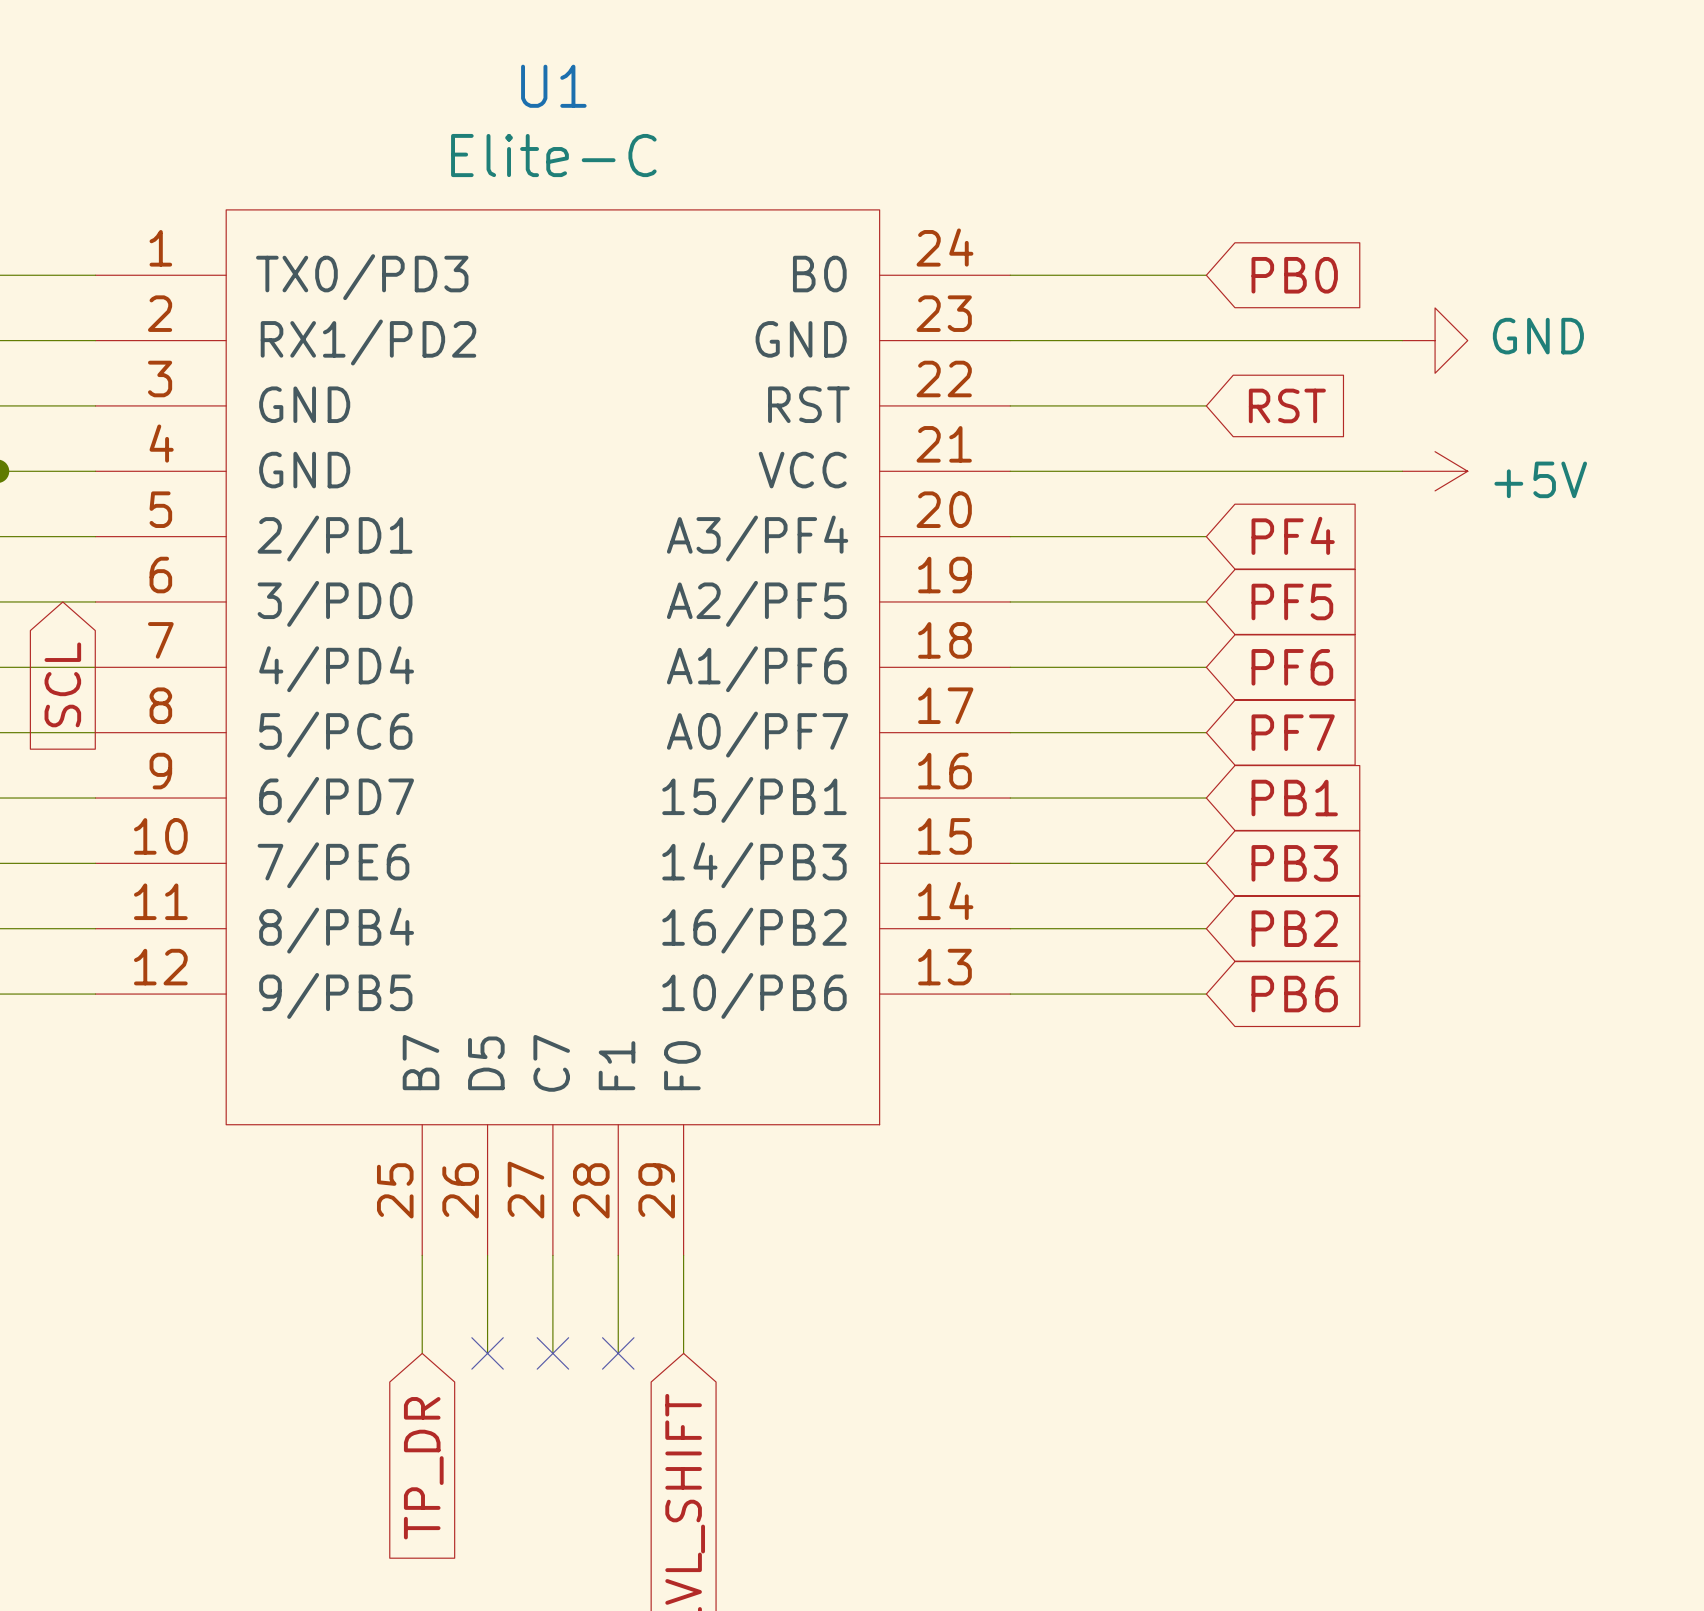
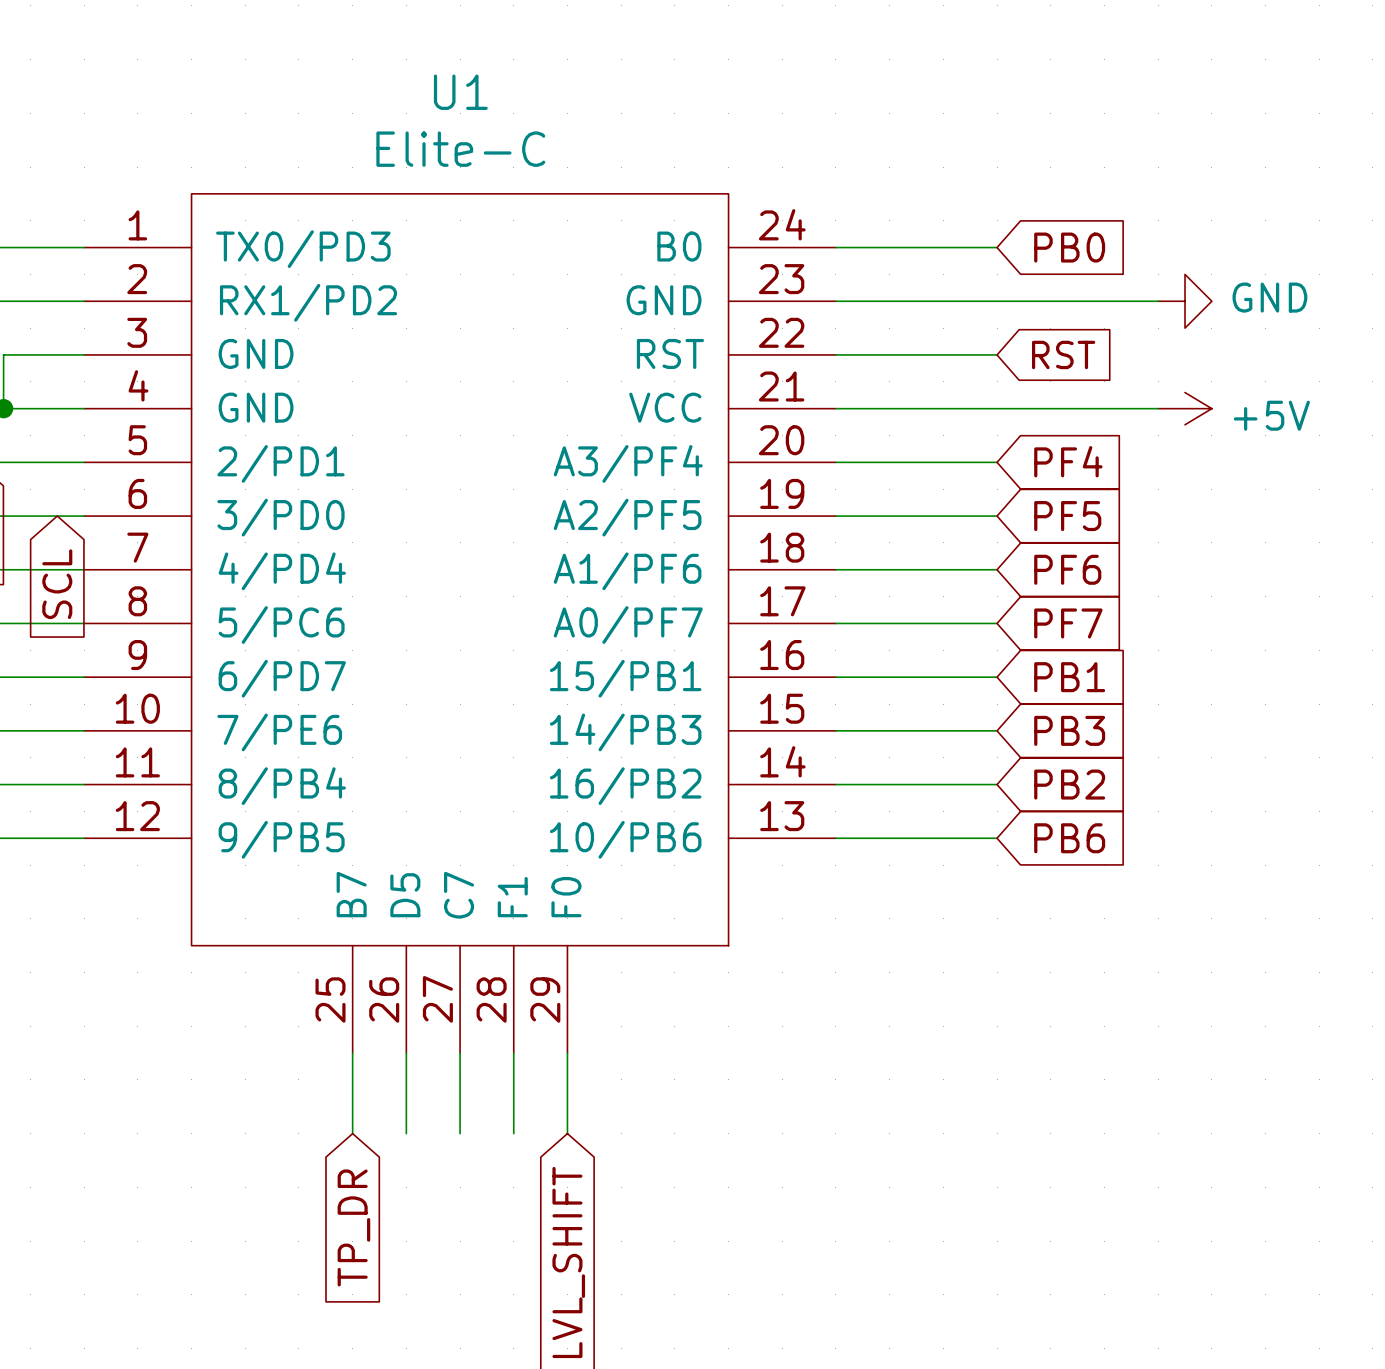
no-connect mark: (487, 1353) -> none
no-connect mark: (552, 1353) -> none
no-connect mark: (618, 1353) -> none

